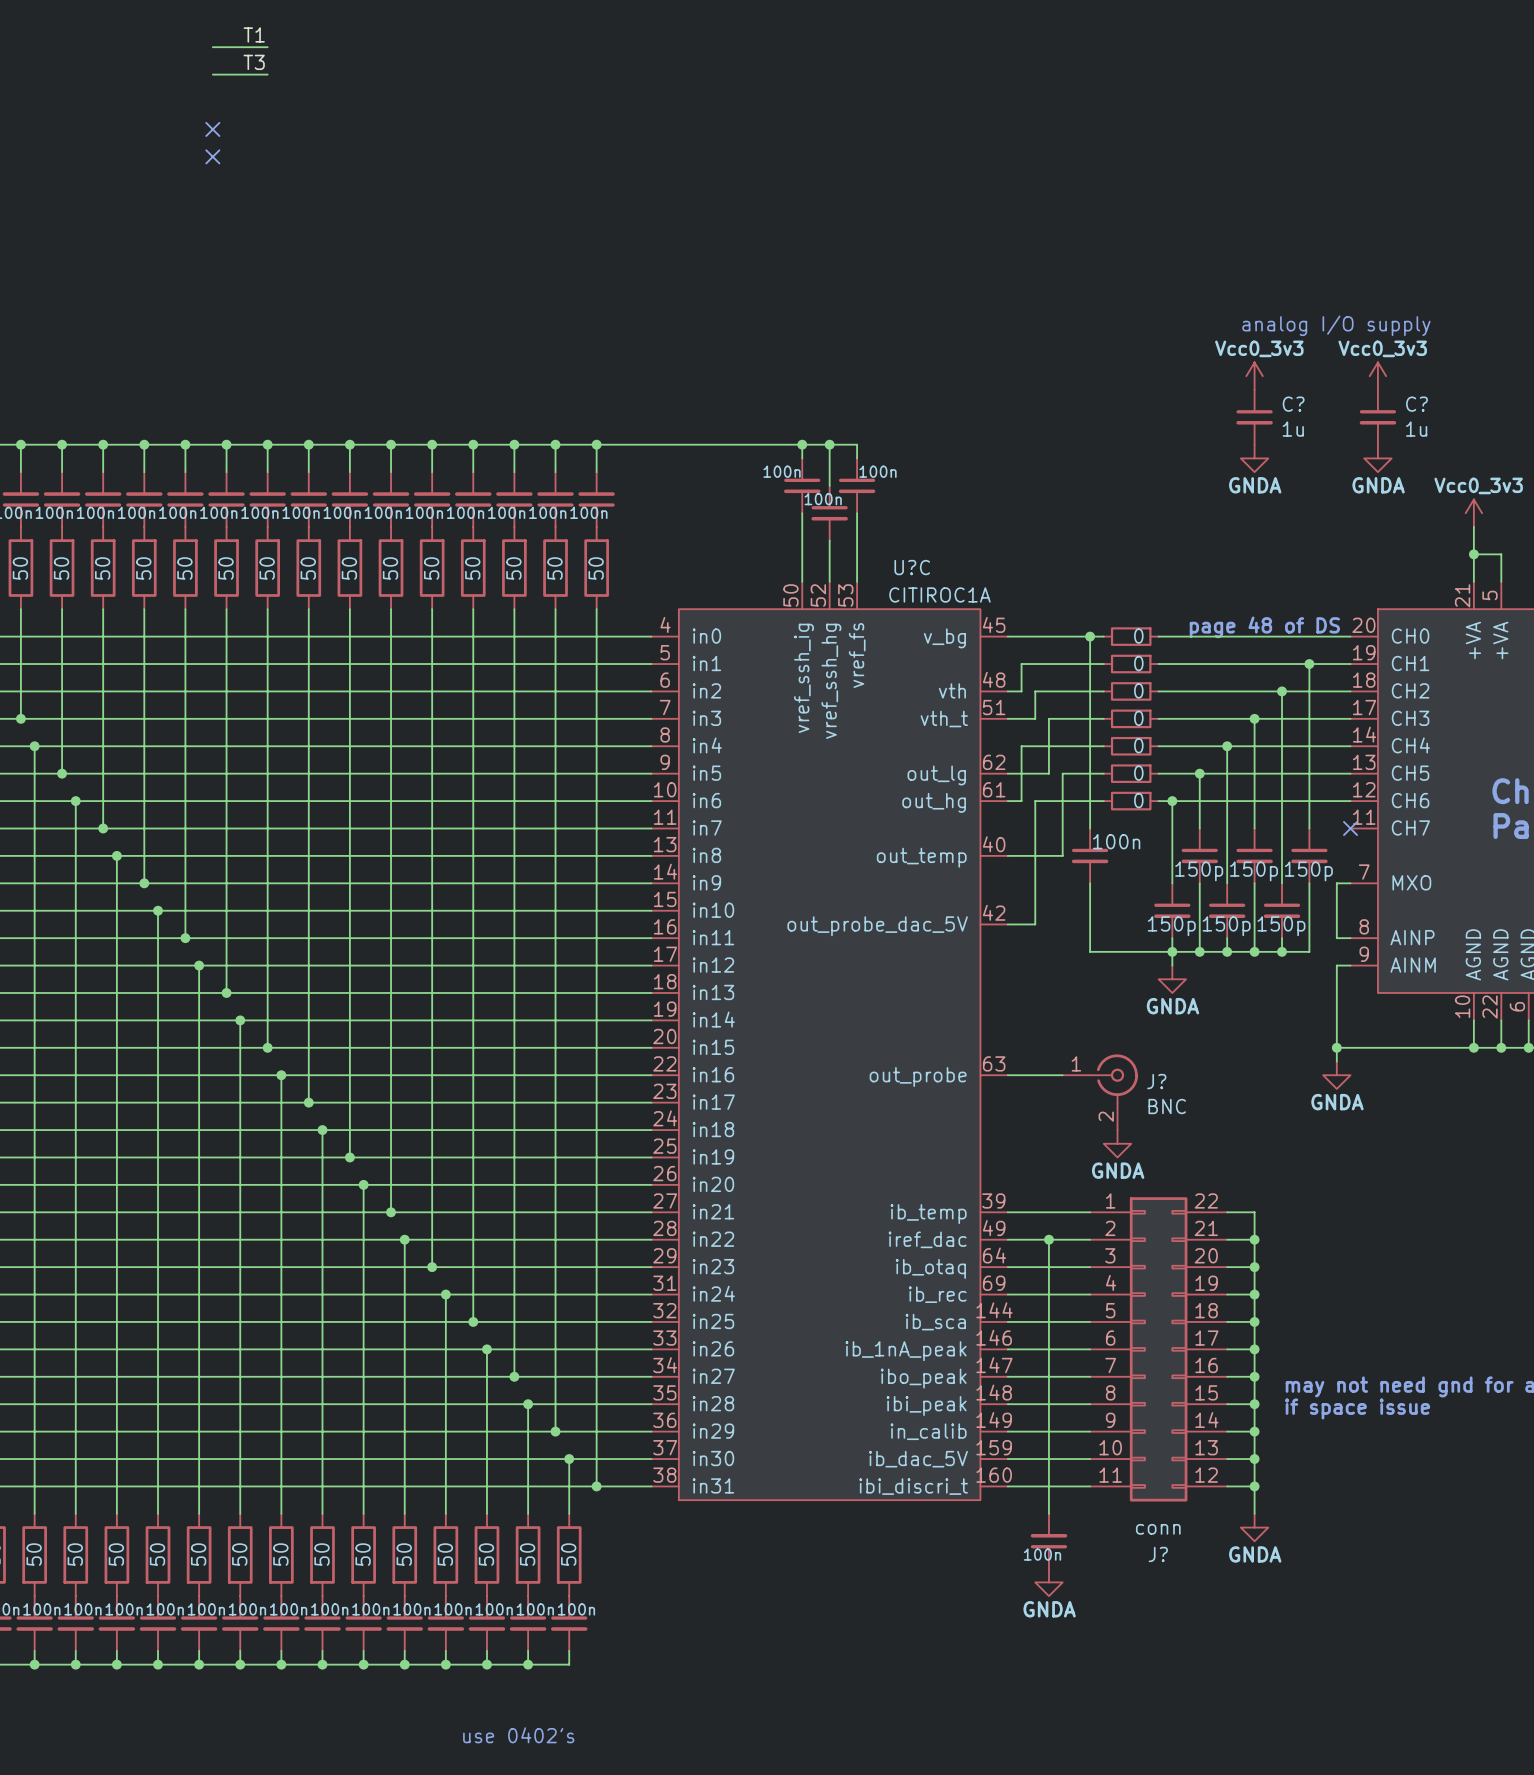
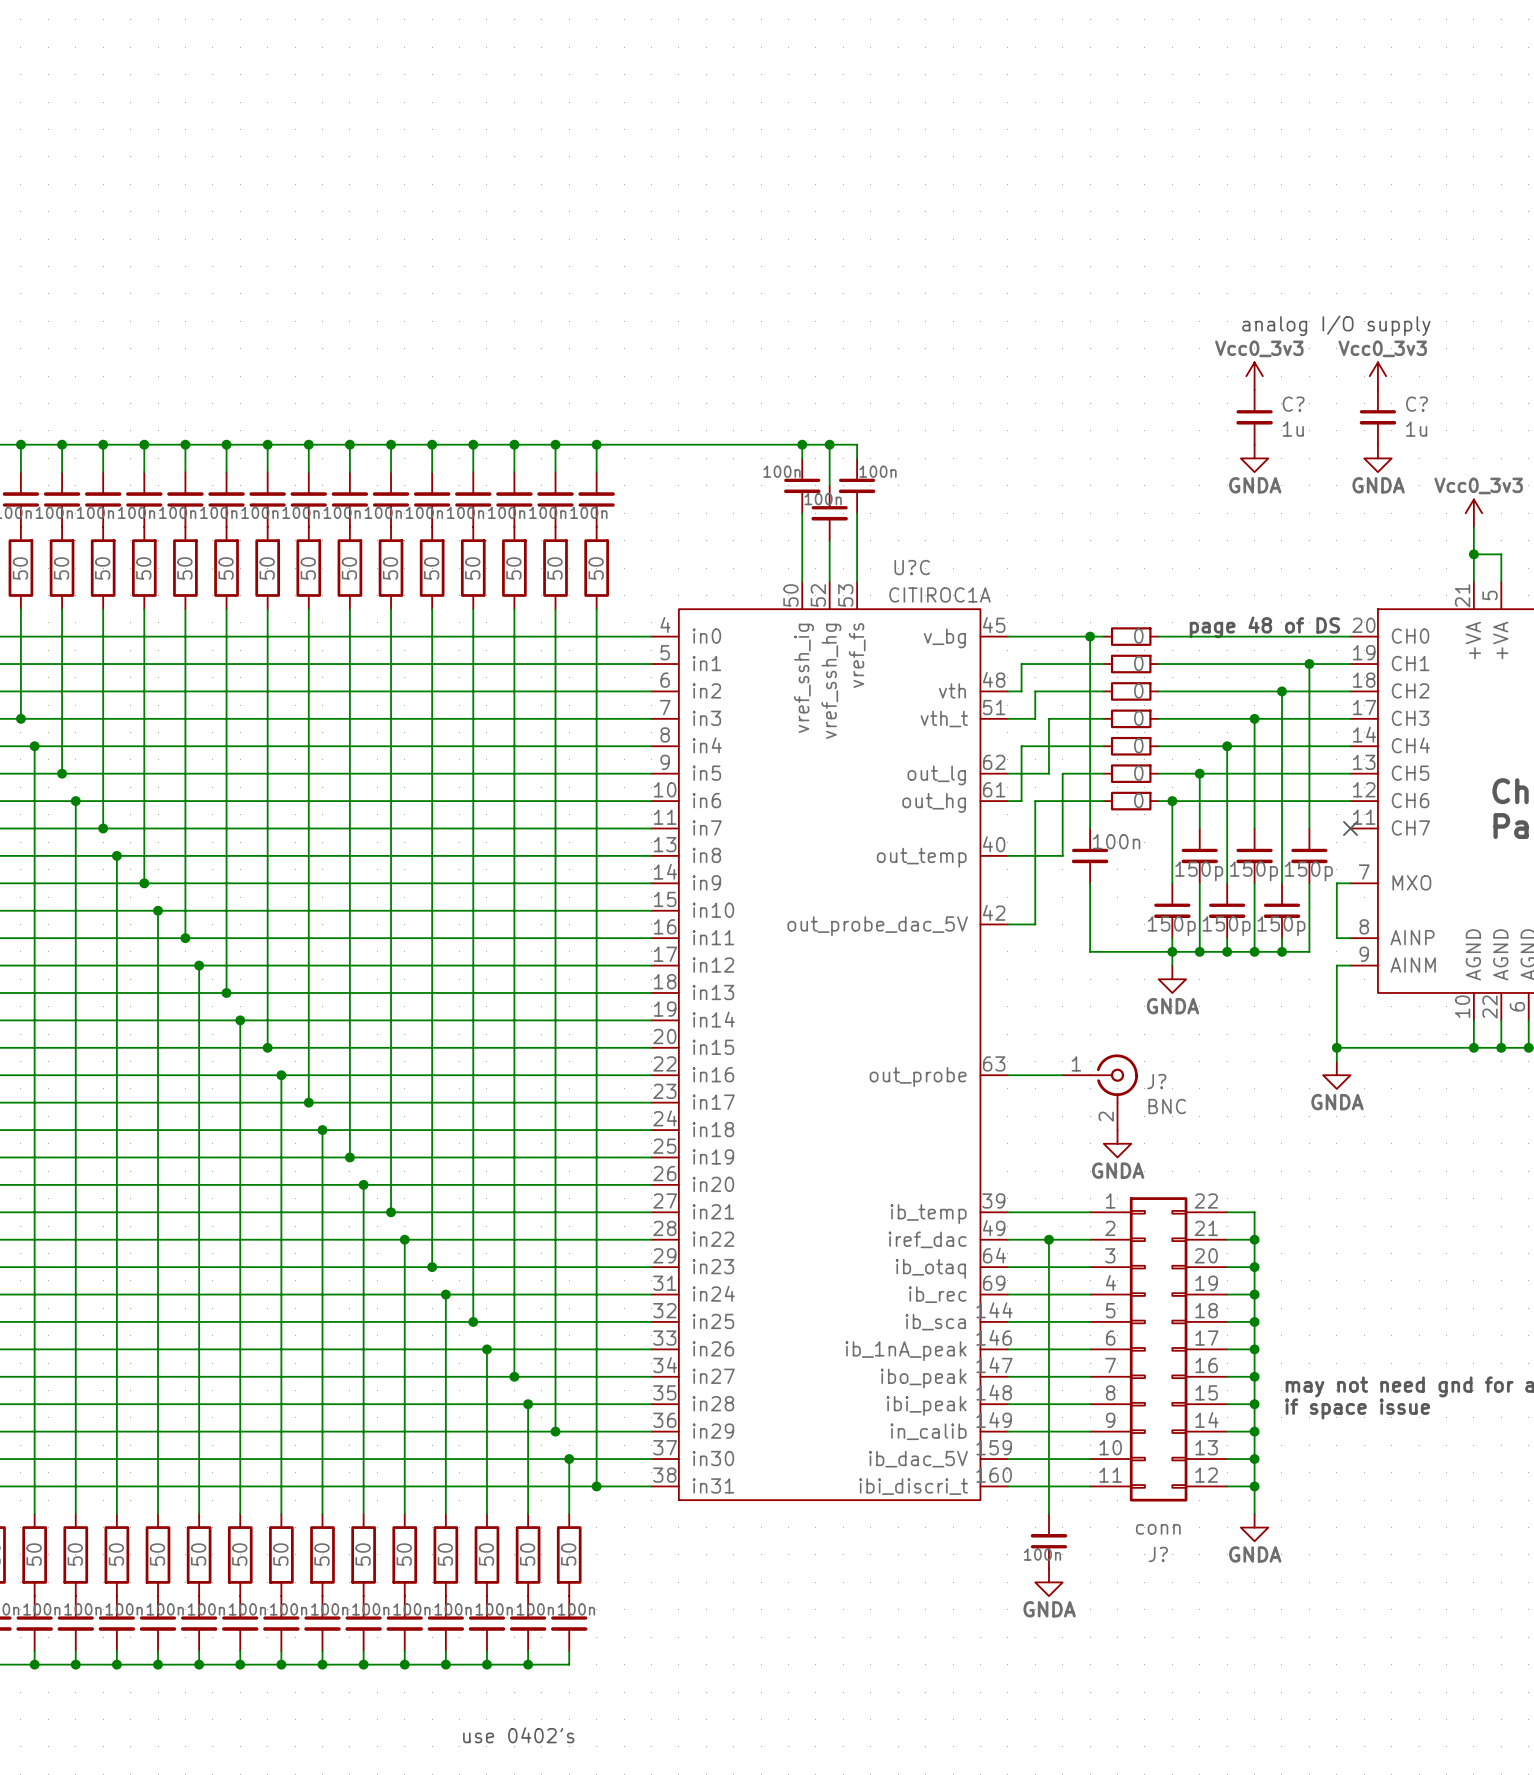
label: T1 (254, 34) -> none
wire: (212, 47) (267, 47) -> none
label: T3 (254, 62) -> none
wire: (212, 74) (267, 74) -> none
no-connect mark: (212, 129) -> none
no-connect mark: (212, 156) -> none

